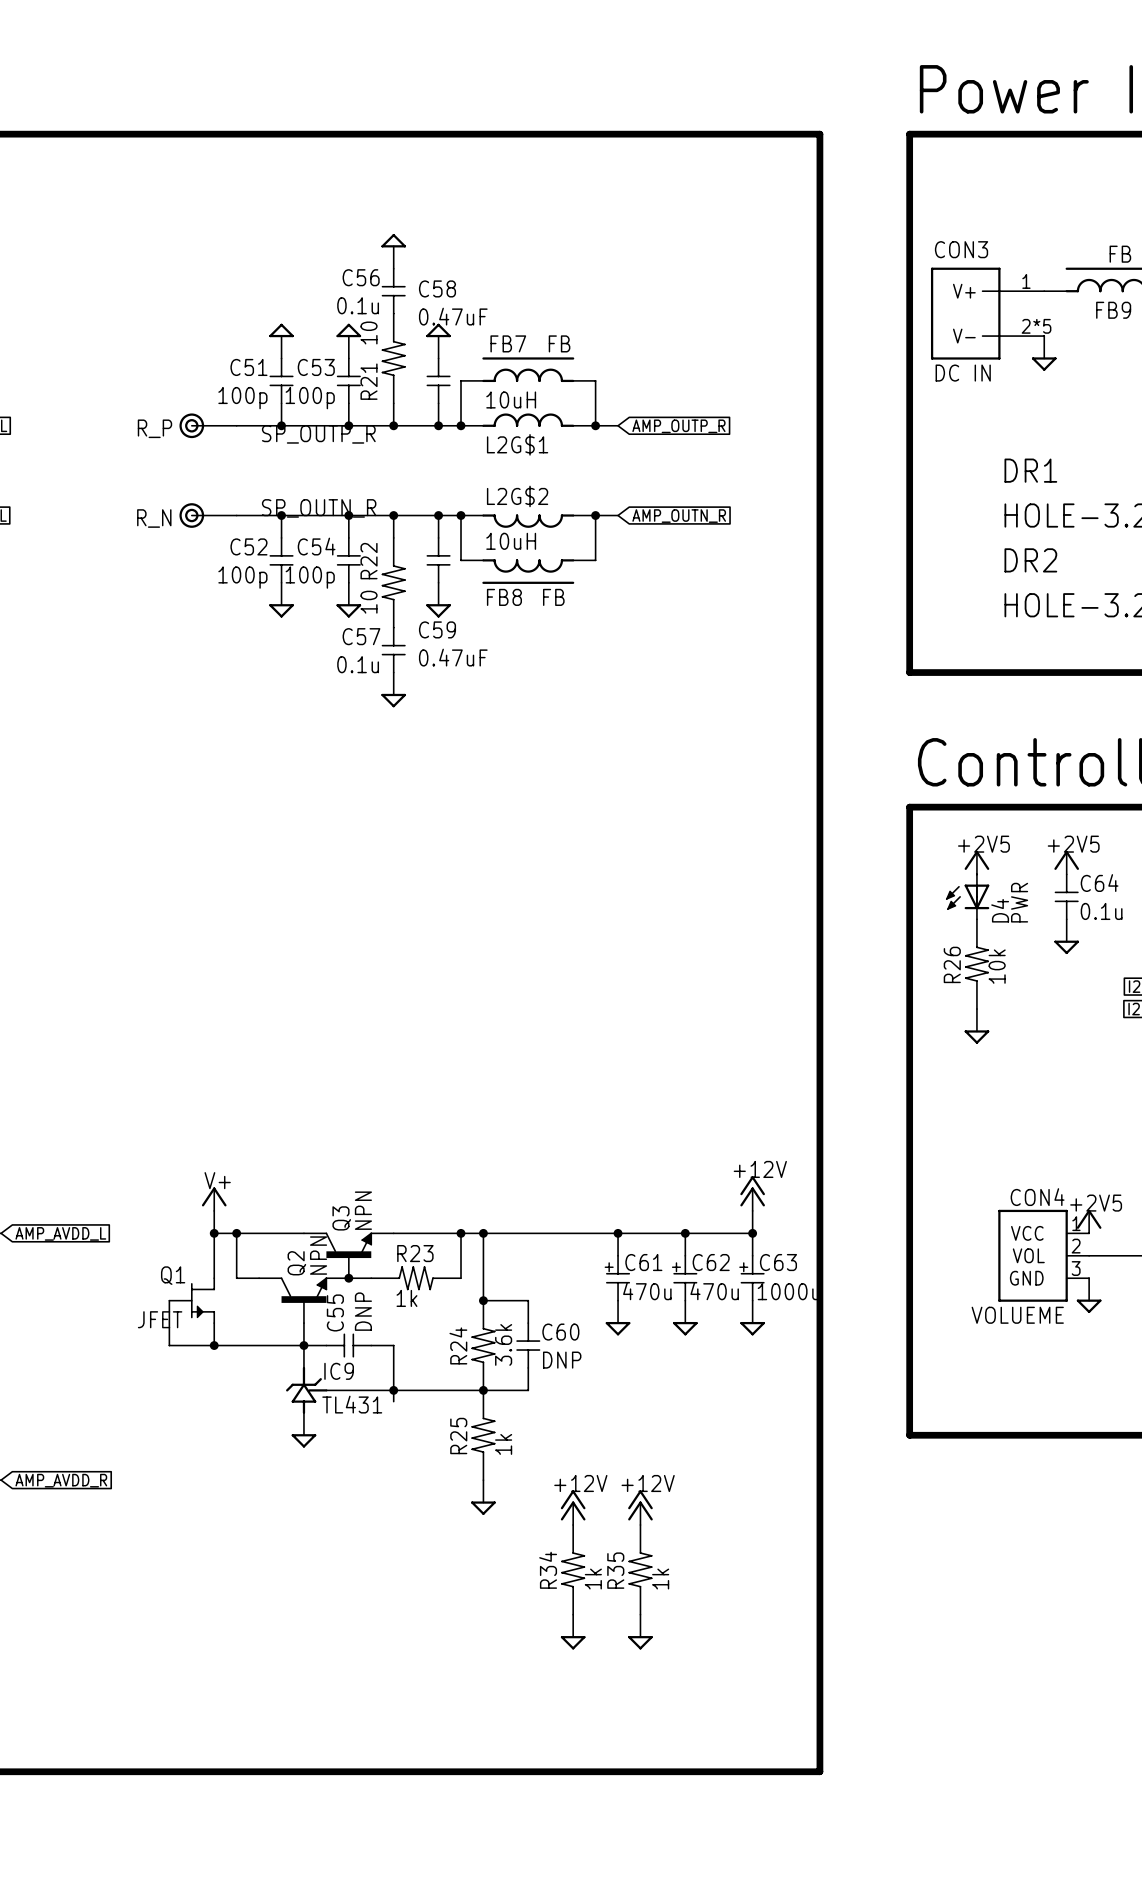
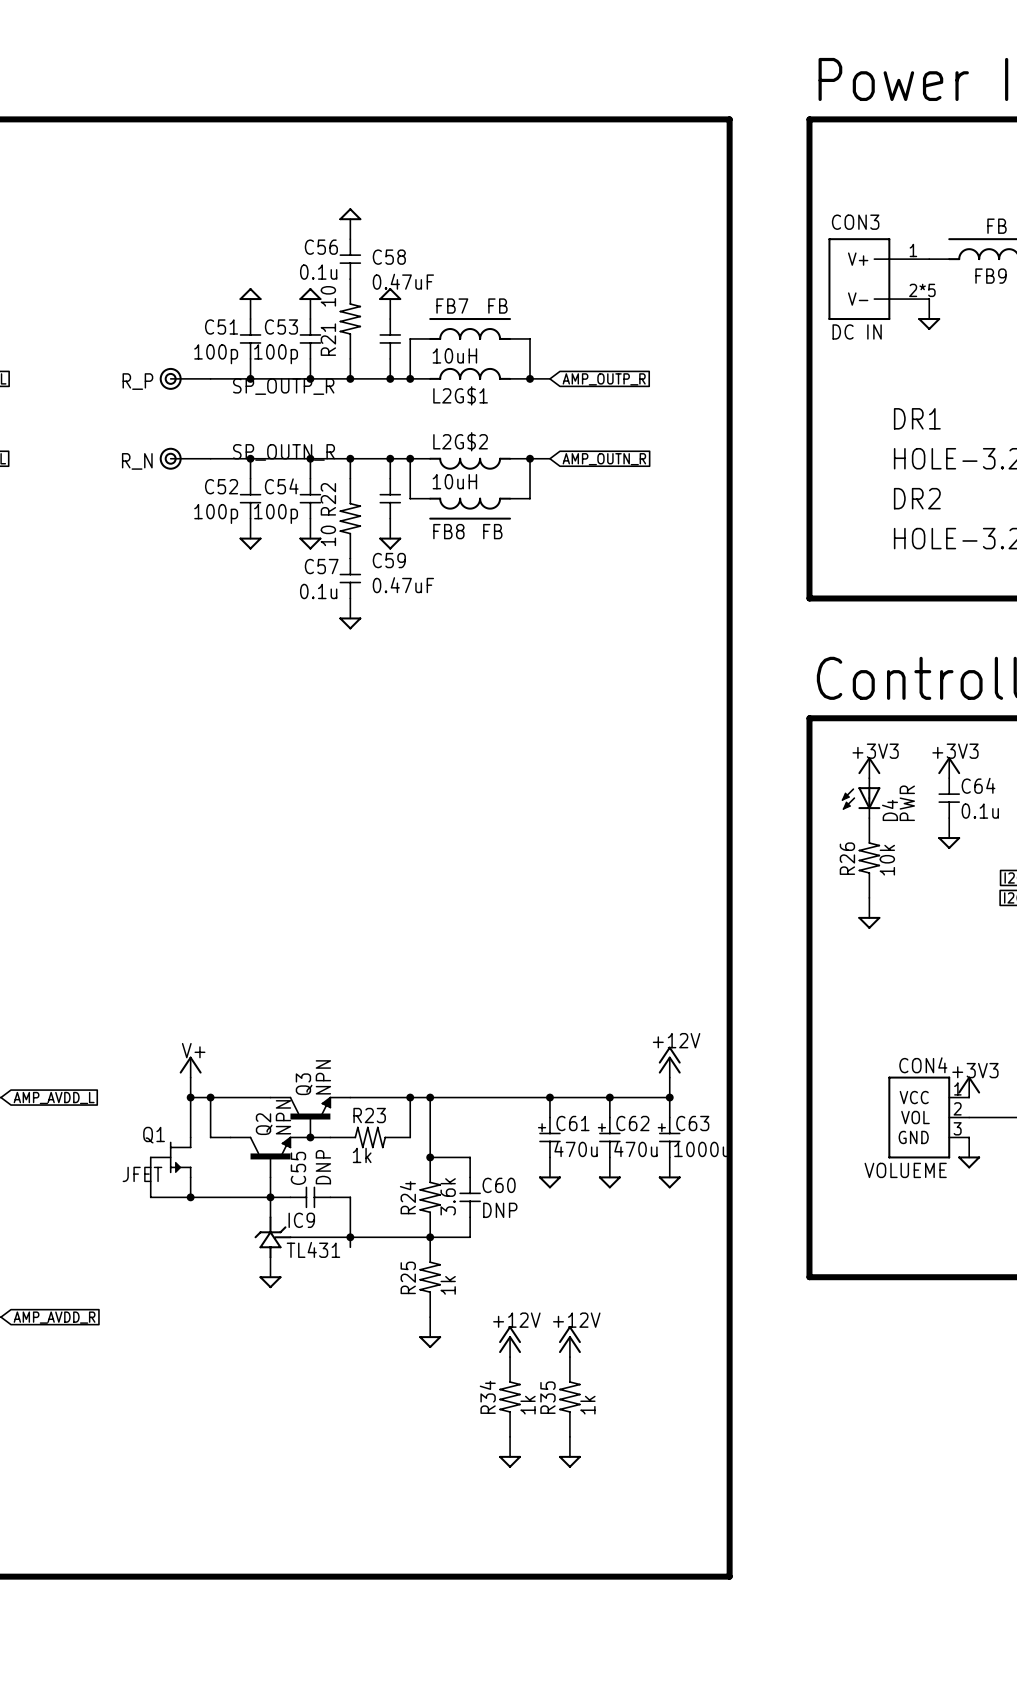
power symbol: +2V5 (976, 862) -> +3V3 (869, 767)
power symbol: +2V5 (1066, 862) -> +3V3 (949, 767)
power symbol: +2V5 (1089, 1221) -> +3V3 (969, 1087)

